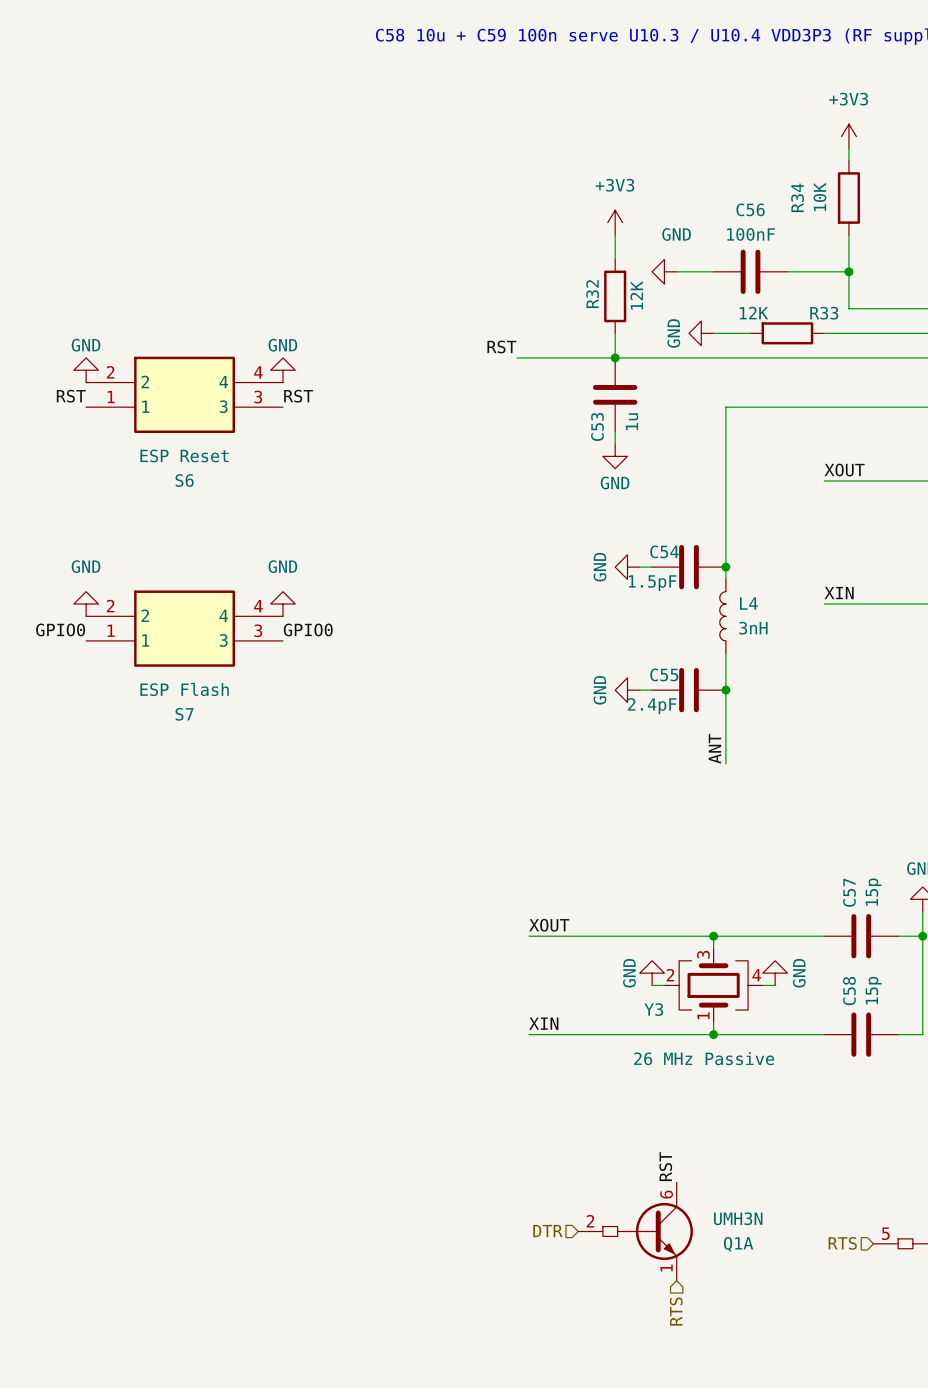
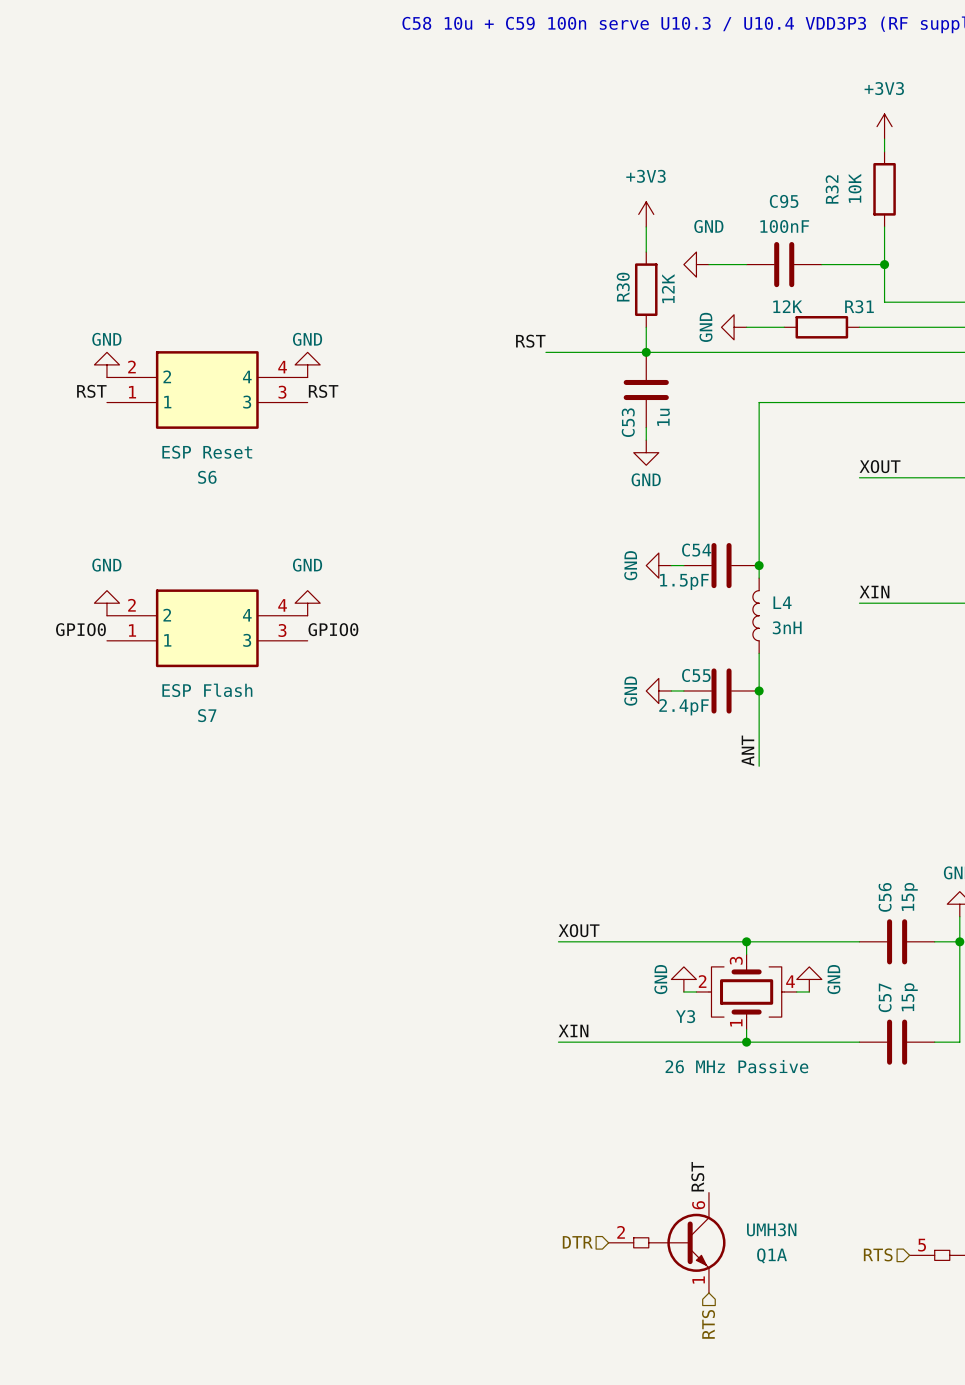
R34 name: R34 (797, 197) -> R32 (832, 189)
C56 name: C56 (750, 209) -> C95 (784, 201)
R32 name: R32 (592, 294) -> R30 (623, 287)
R33 name: R33 (824, 313) -> R31 (859, 306)
C57 name: C57 (849, 892) -> C56 (885, 897)
C58 name: C58 (849, 991) -> C57 (885, 997)

